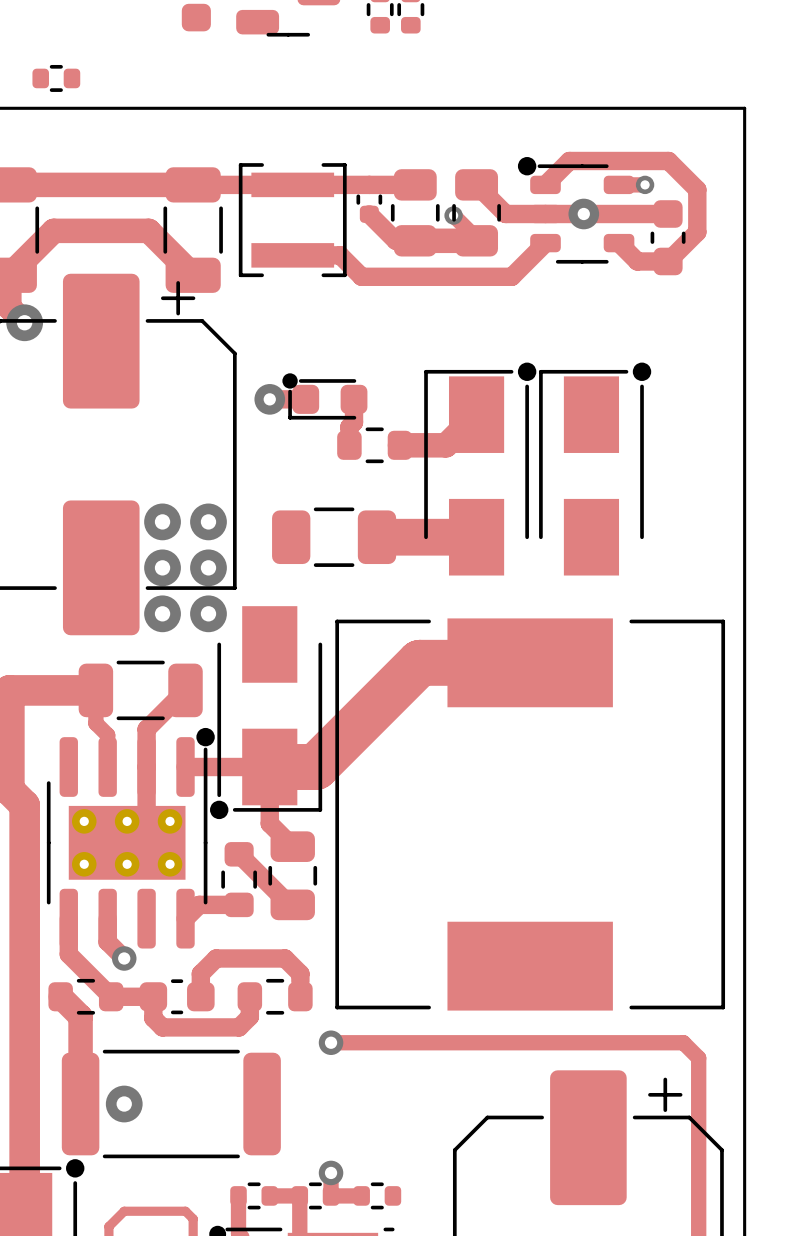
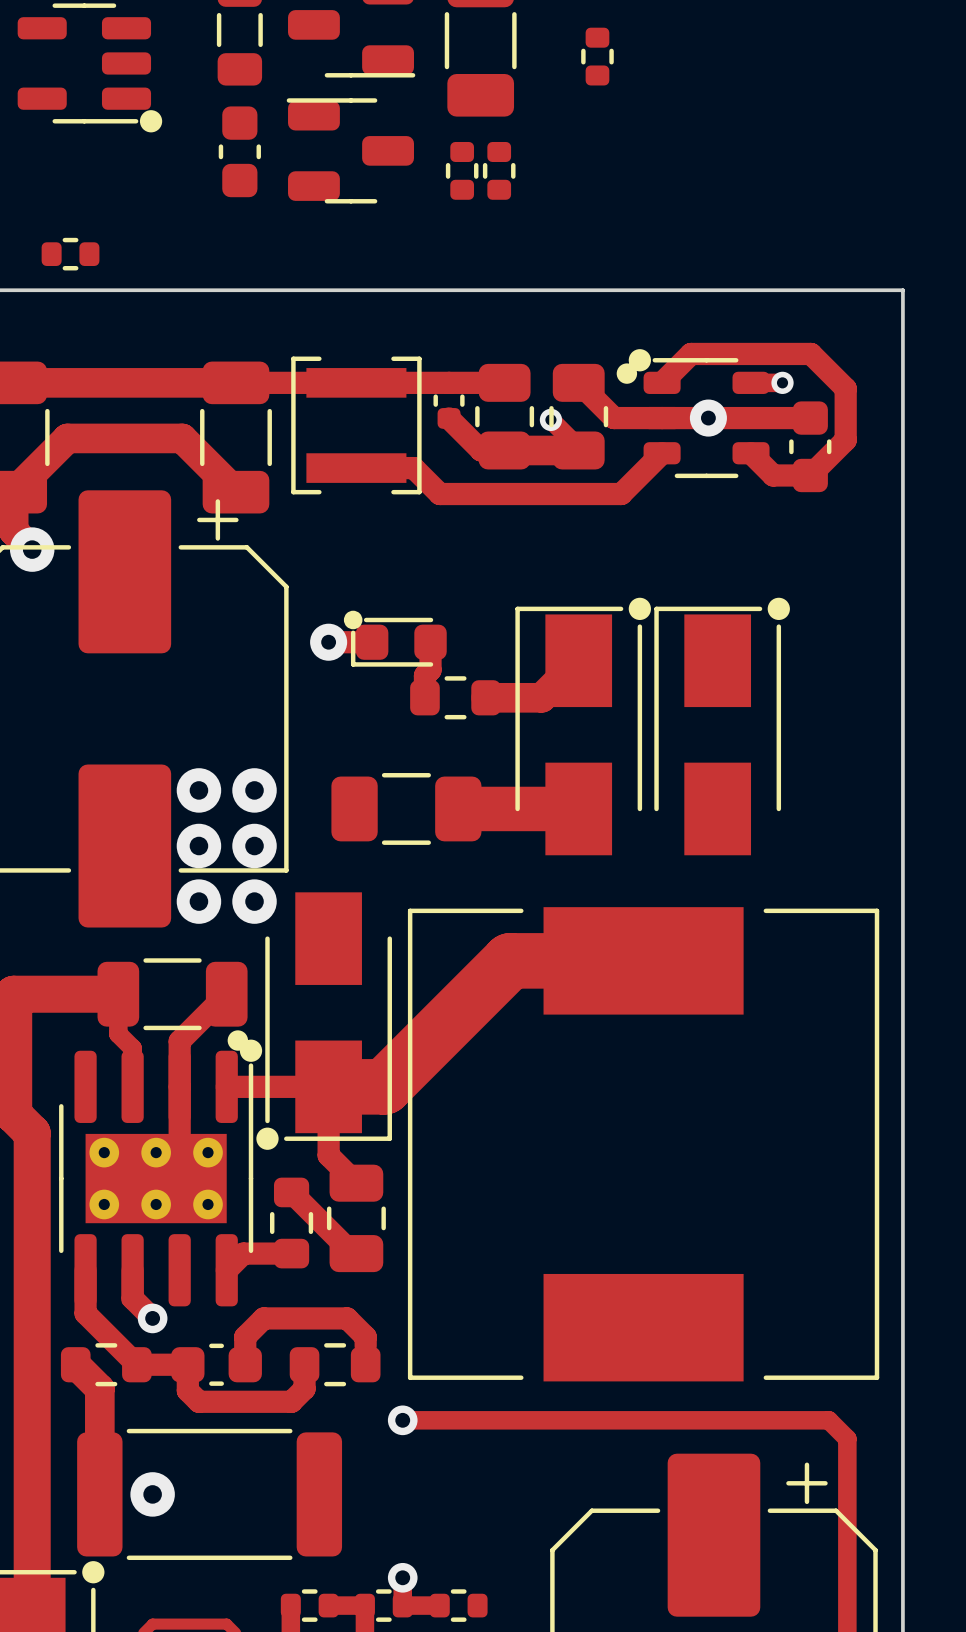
drawing: none -> [616, 363, 638, 384]
drawing: none -> [227, 1030, 249, 1051]

